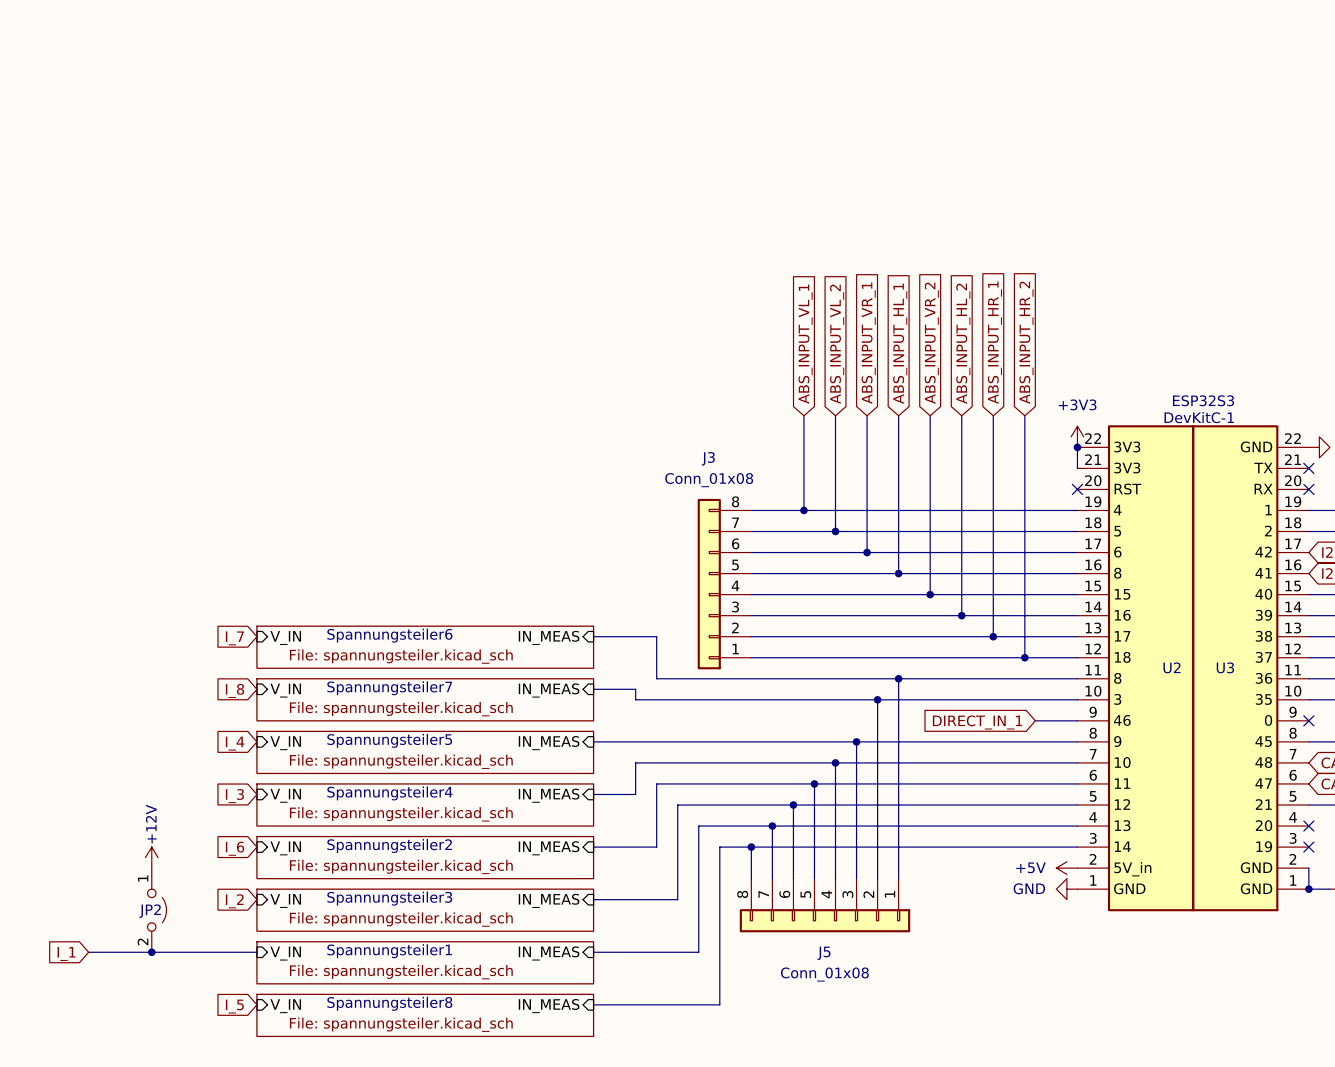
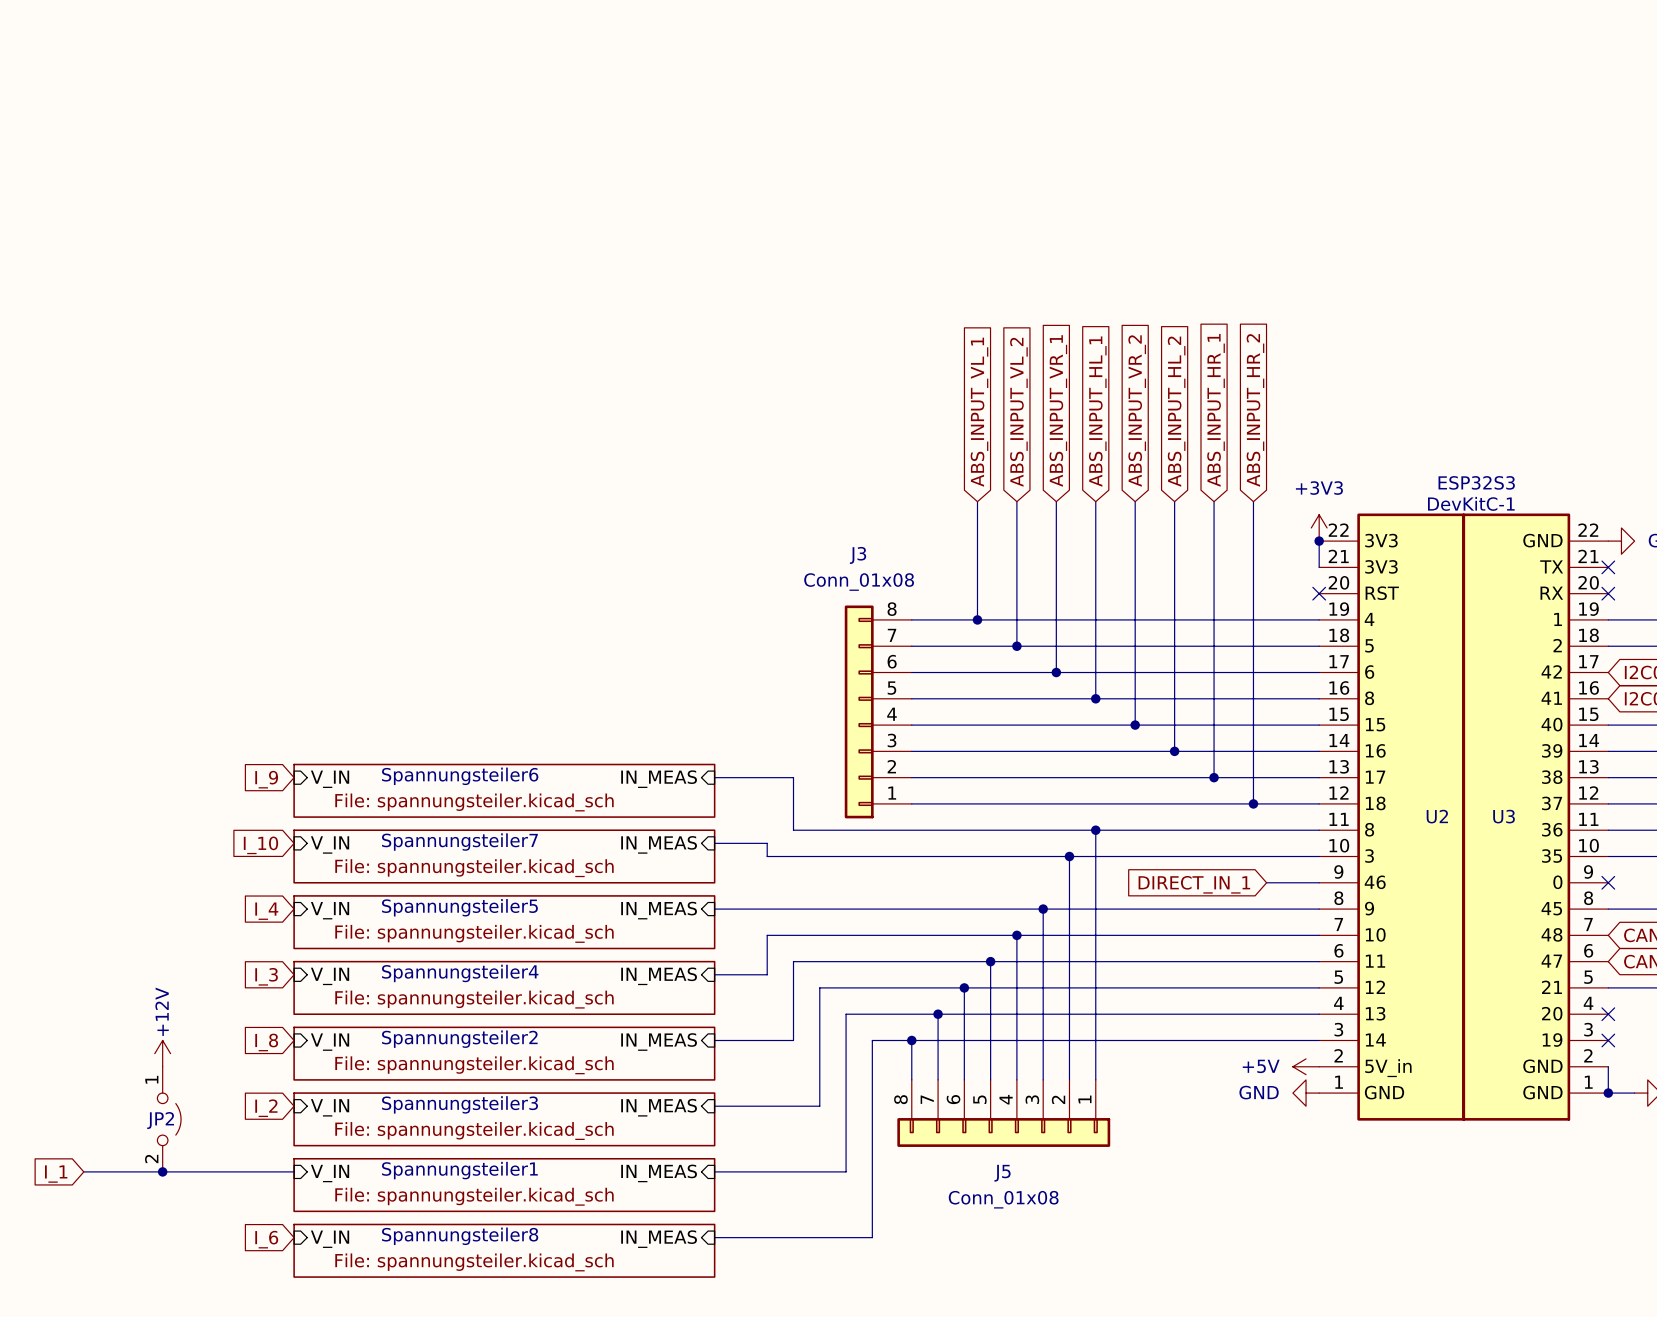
global label: I_7 (234, 638) -> I_9 (266, 779)
global label: I_8 (235, 690) -> I_10 (260, 845)
global label: I_6 (235, 848) -> I_8 (266, 1042)
global label: I_5 (234, 1006) -> I_6 (266, 1239)

